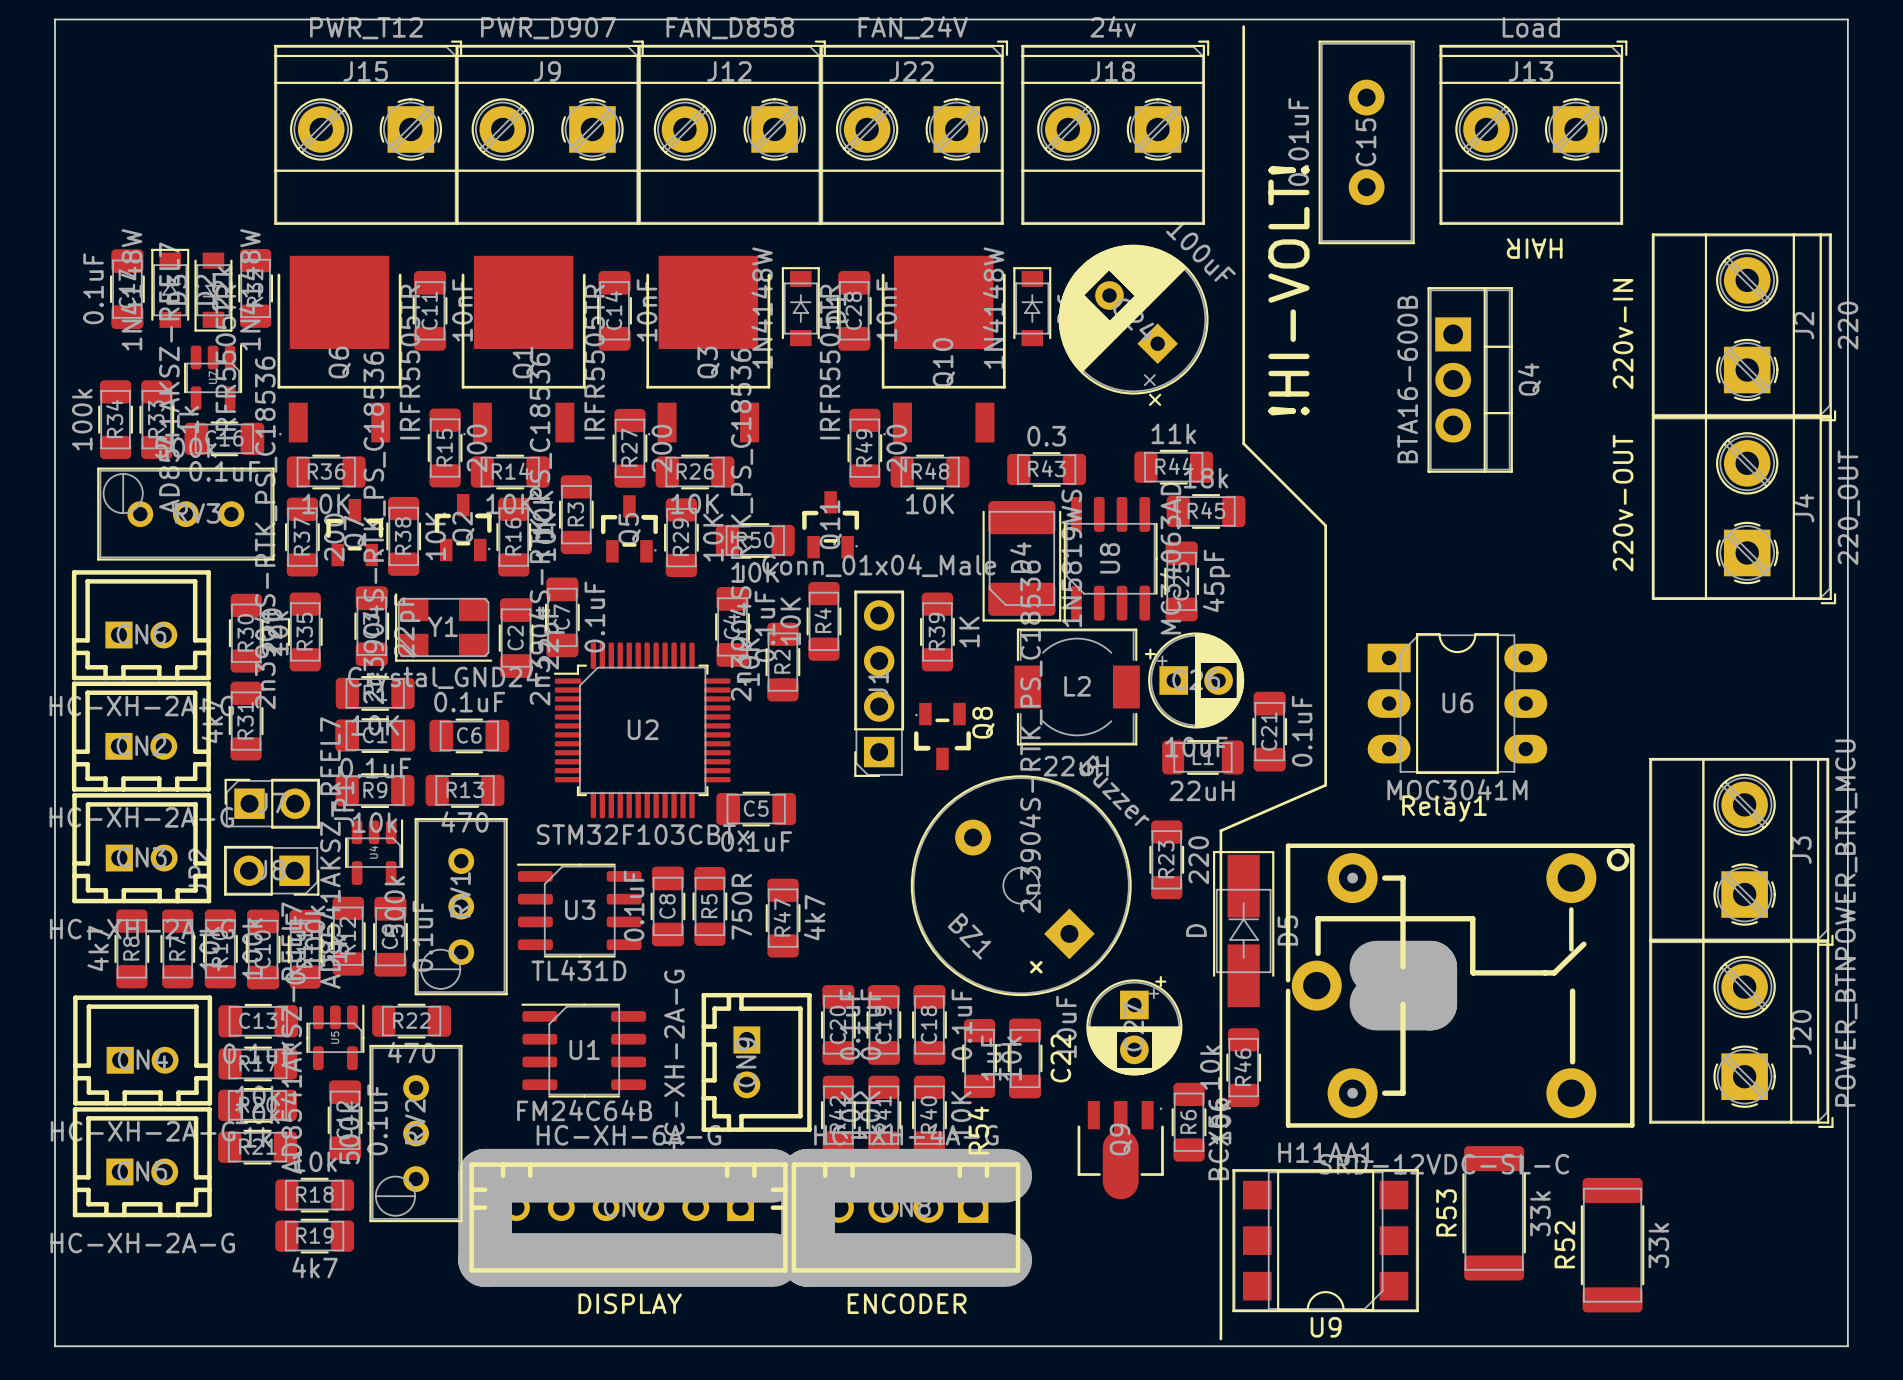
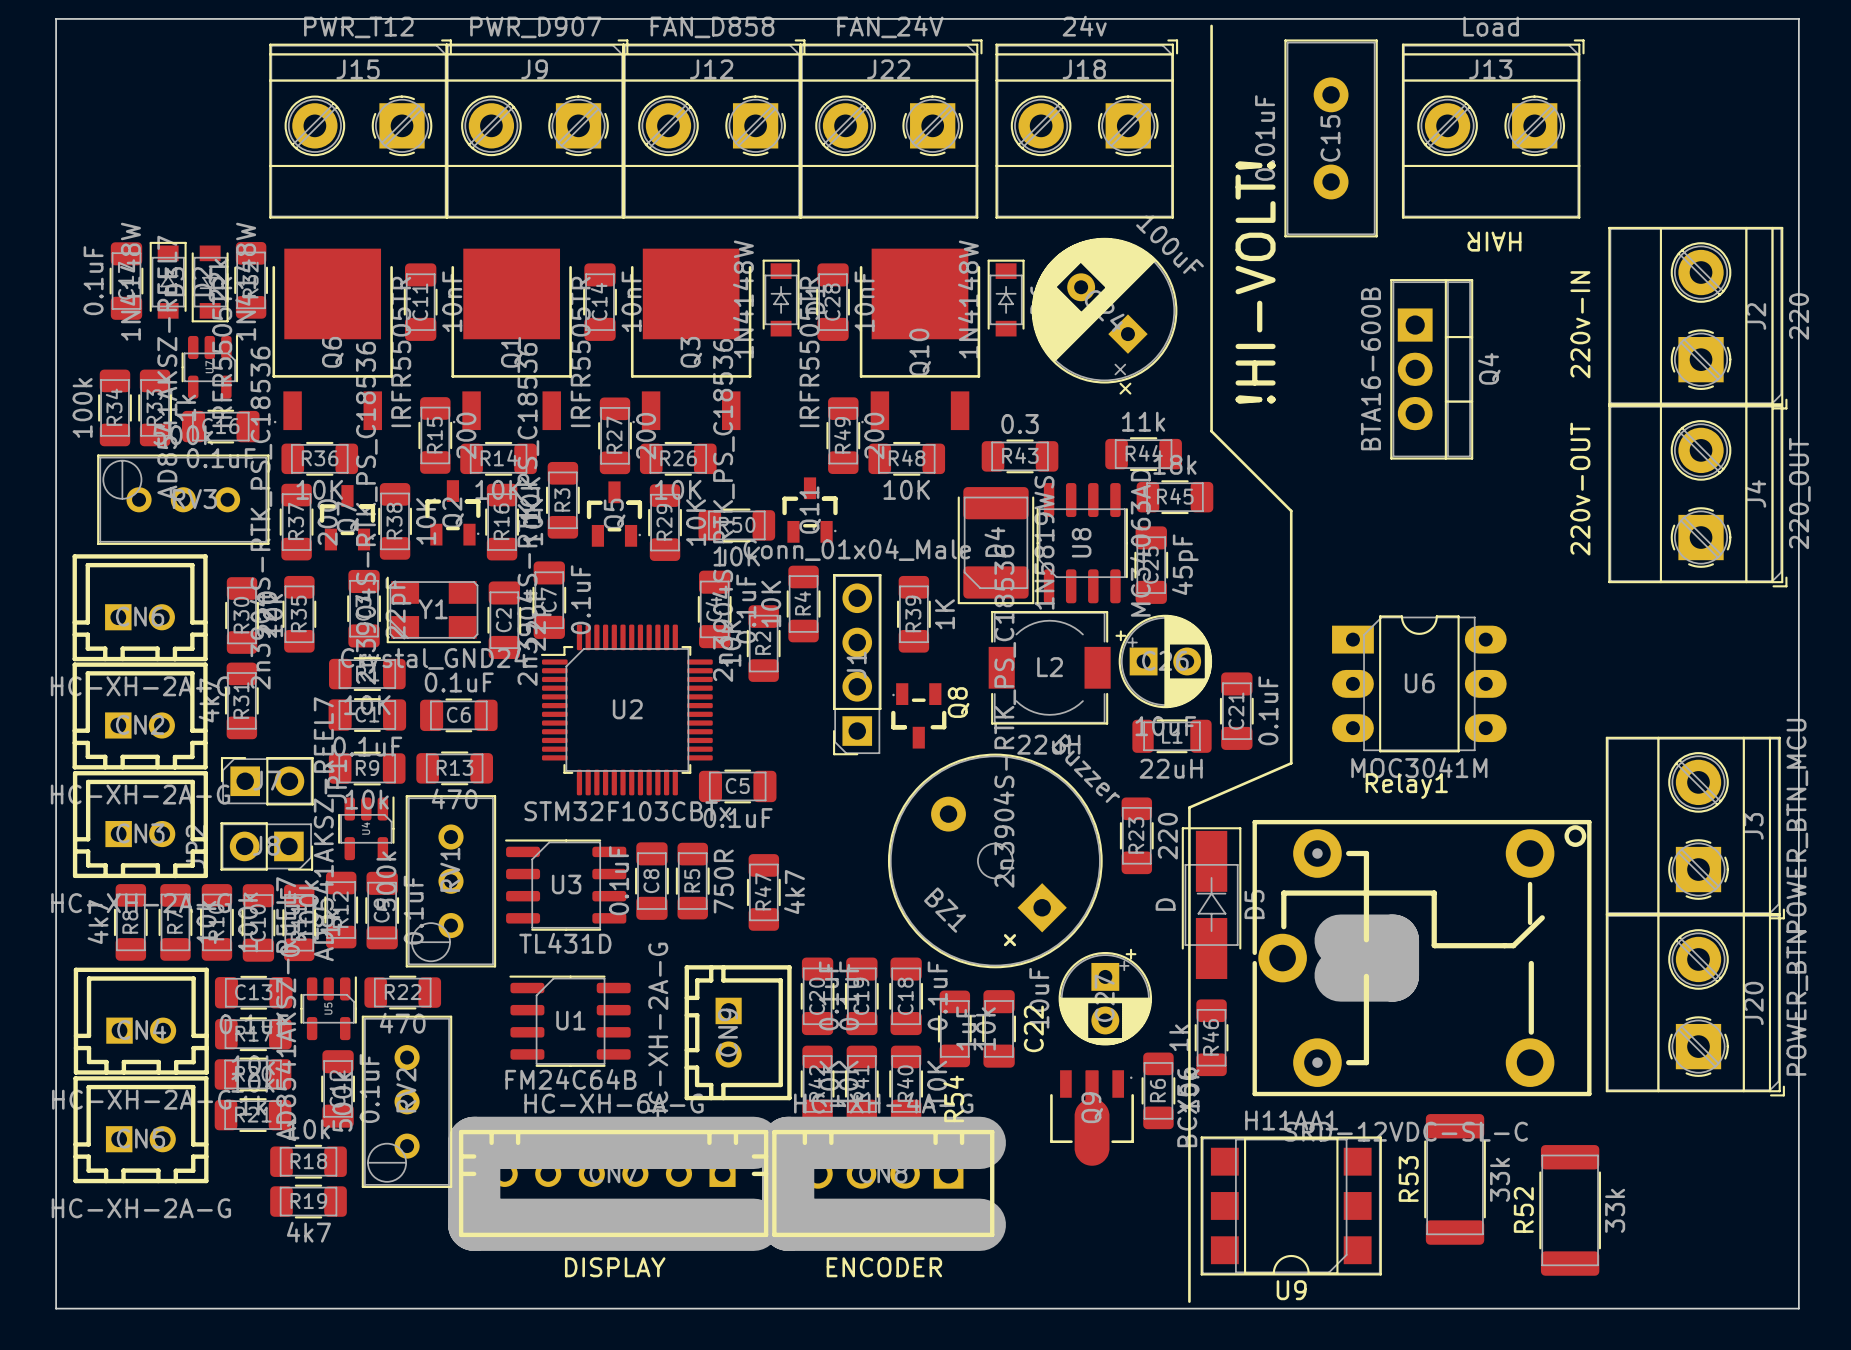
R46 value: 10k (1210, 1067) -> 1k (1179, 1037)

